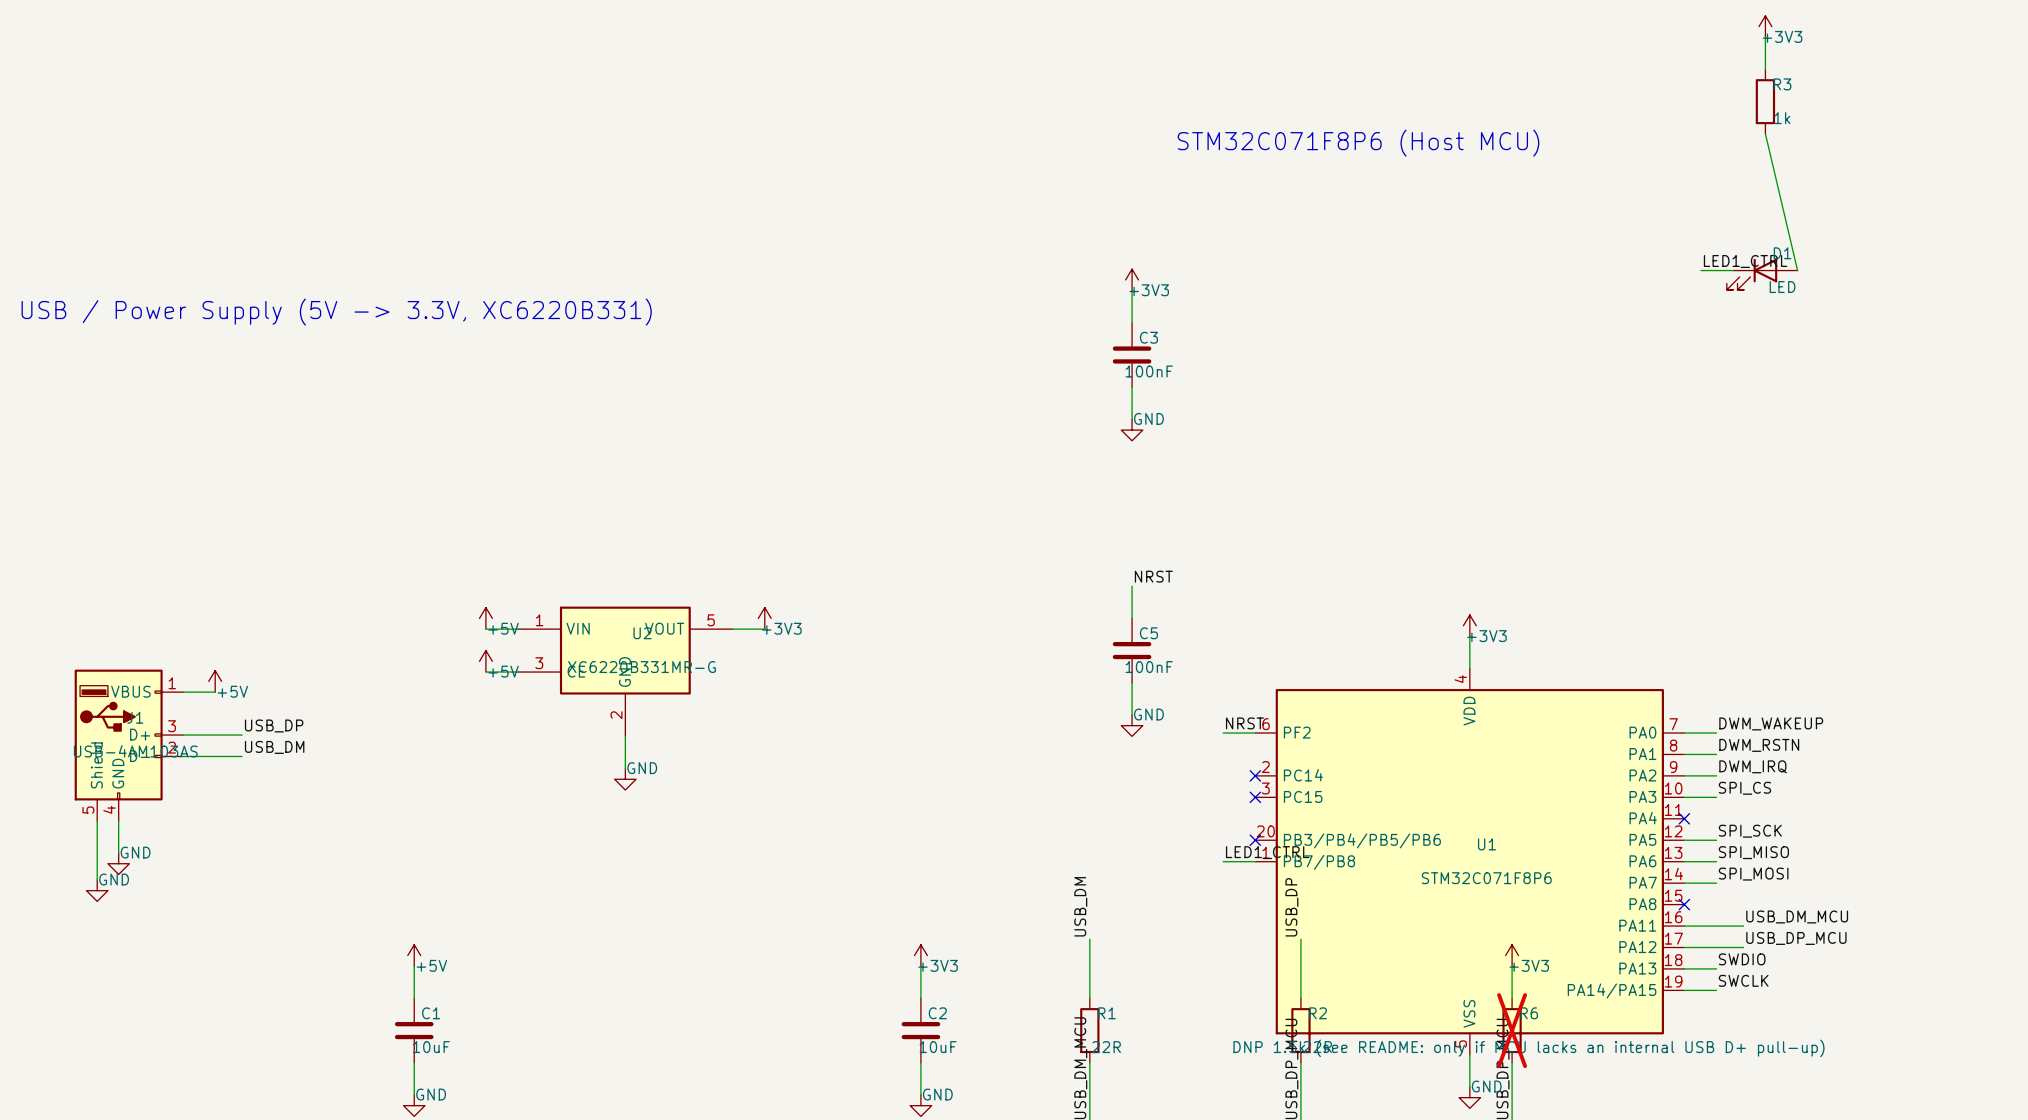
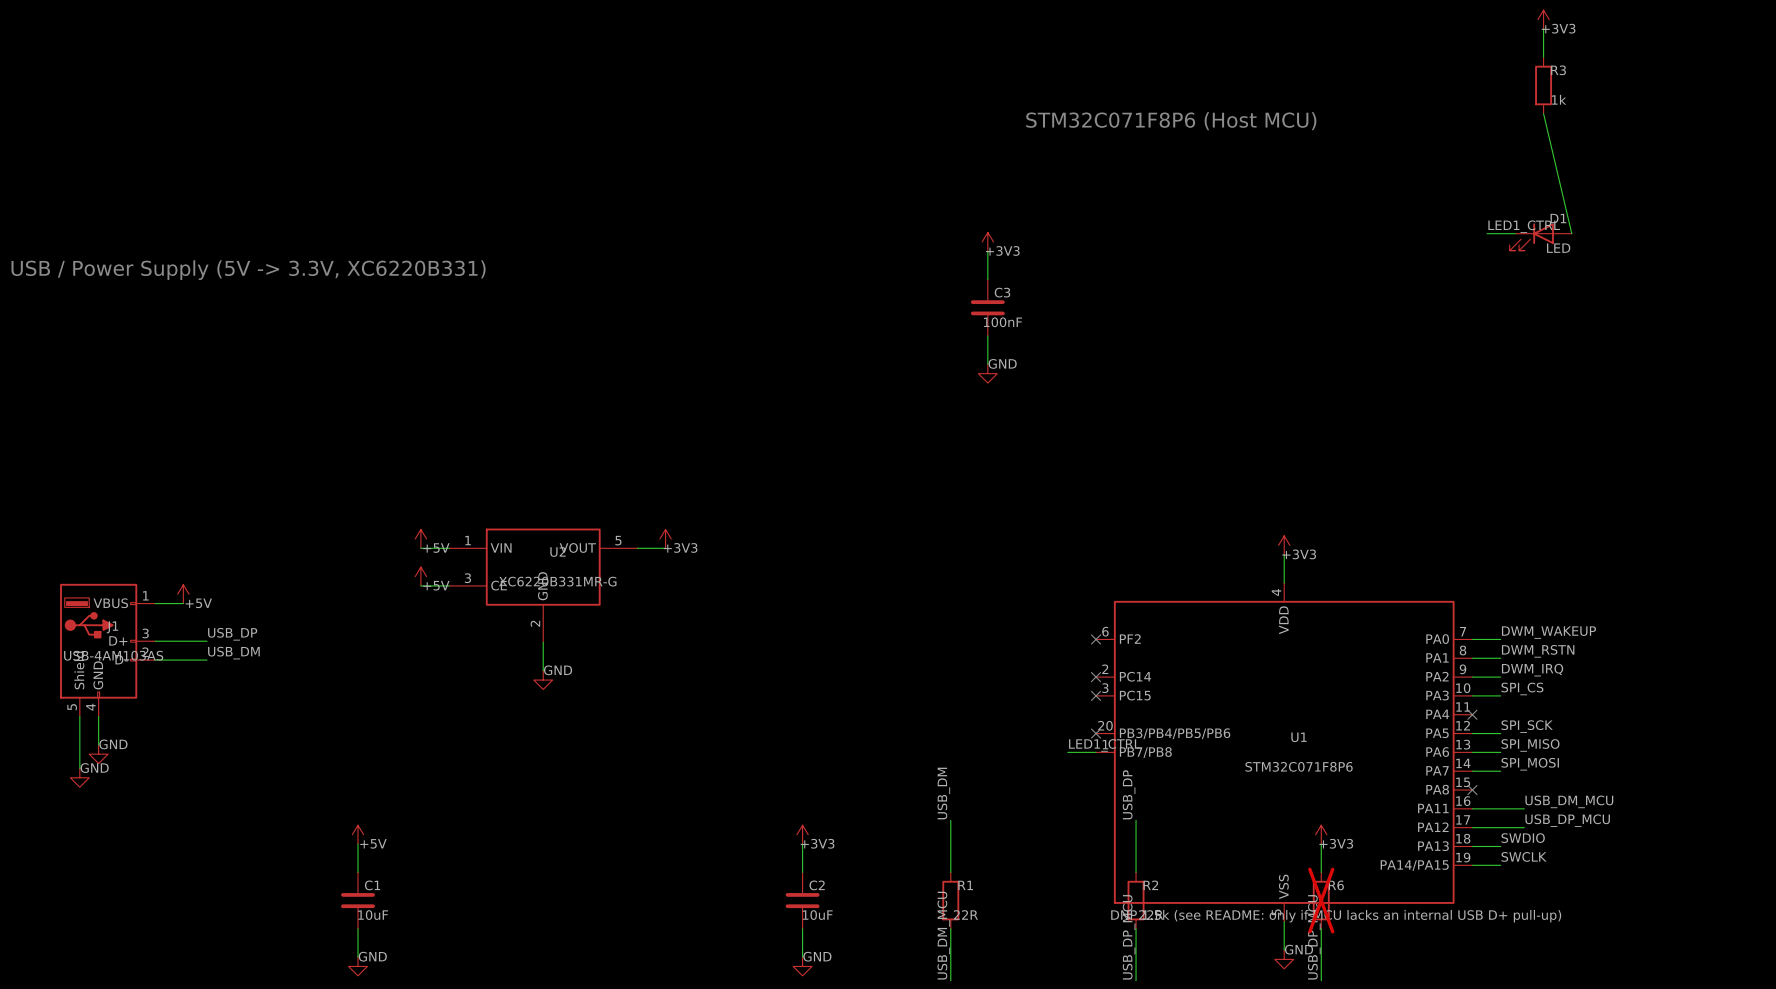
label: NRST (1153, 576) -> none
wire: (1132, 586) (1132, 618) -> none
C5: 100nF (1132, 650) -> none
wire: (1132, 682) (1132, 714) -> none
label: NRST (1244, 723) -> none
power symbol: GND (1132, 725) -> none
wire: (1223, 733) (1255, 733) -> none
no-connect mark: none -> (1096, 639)

